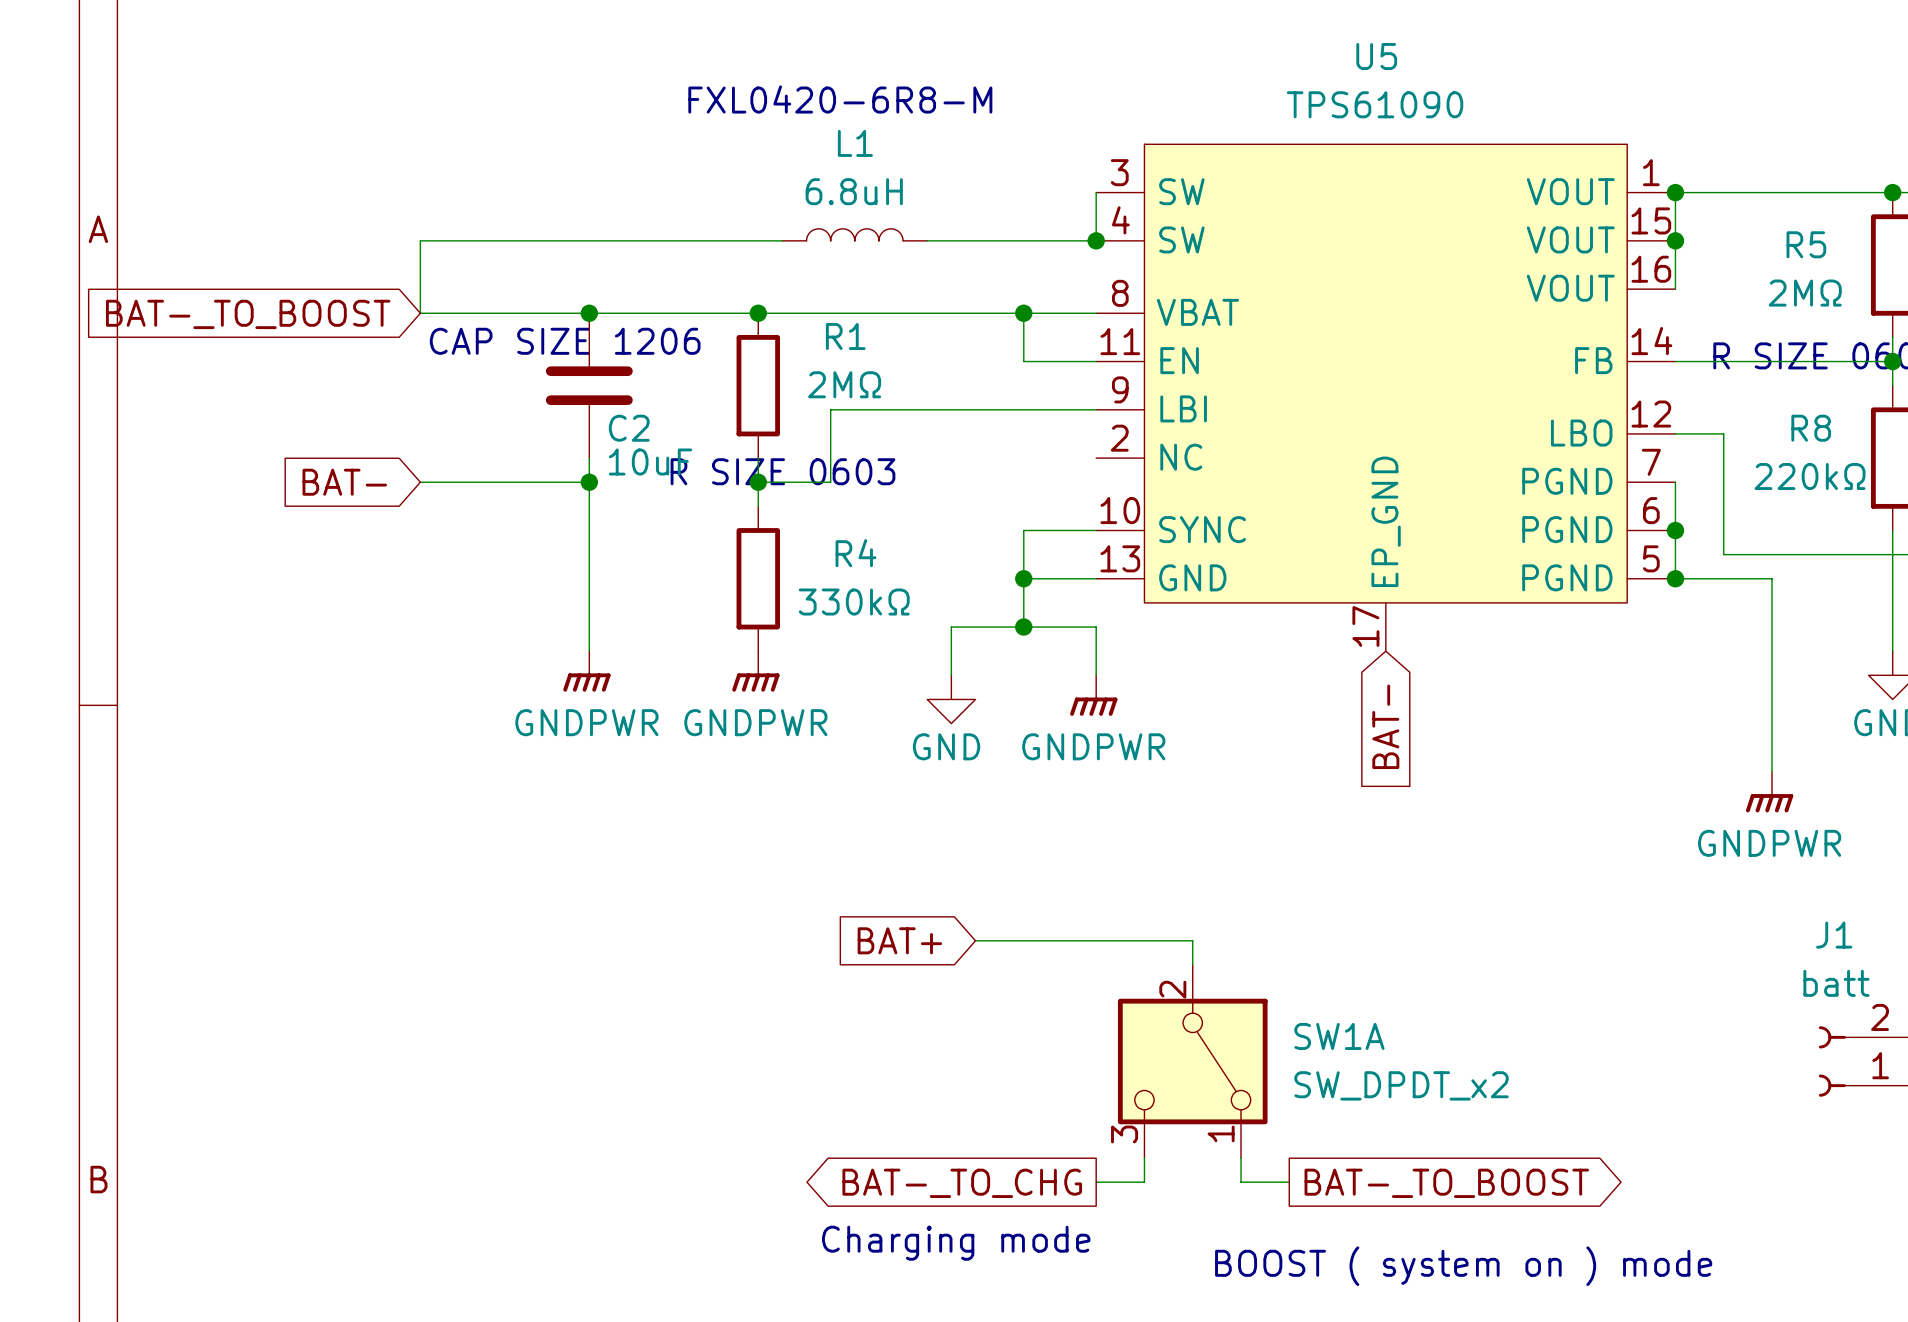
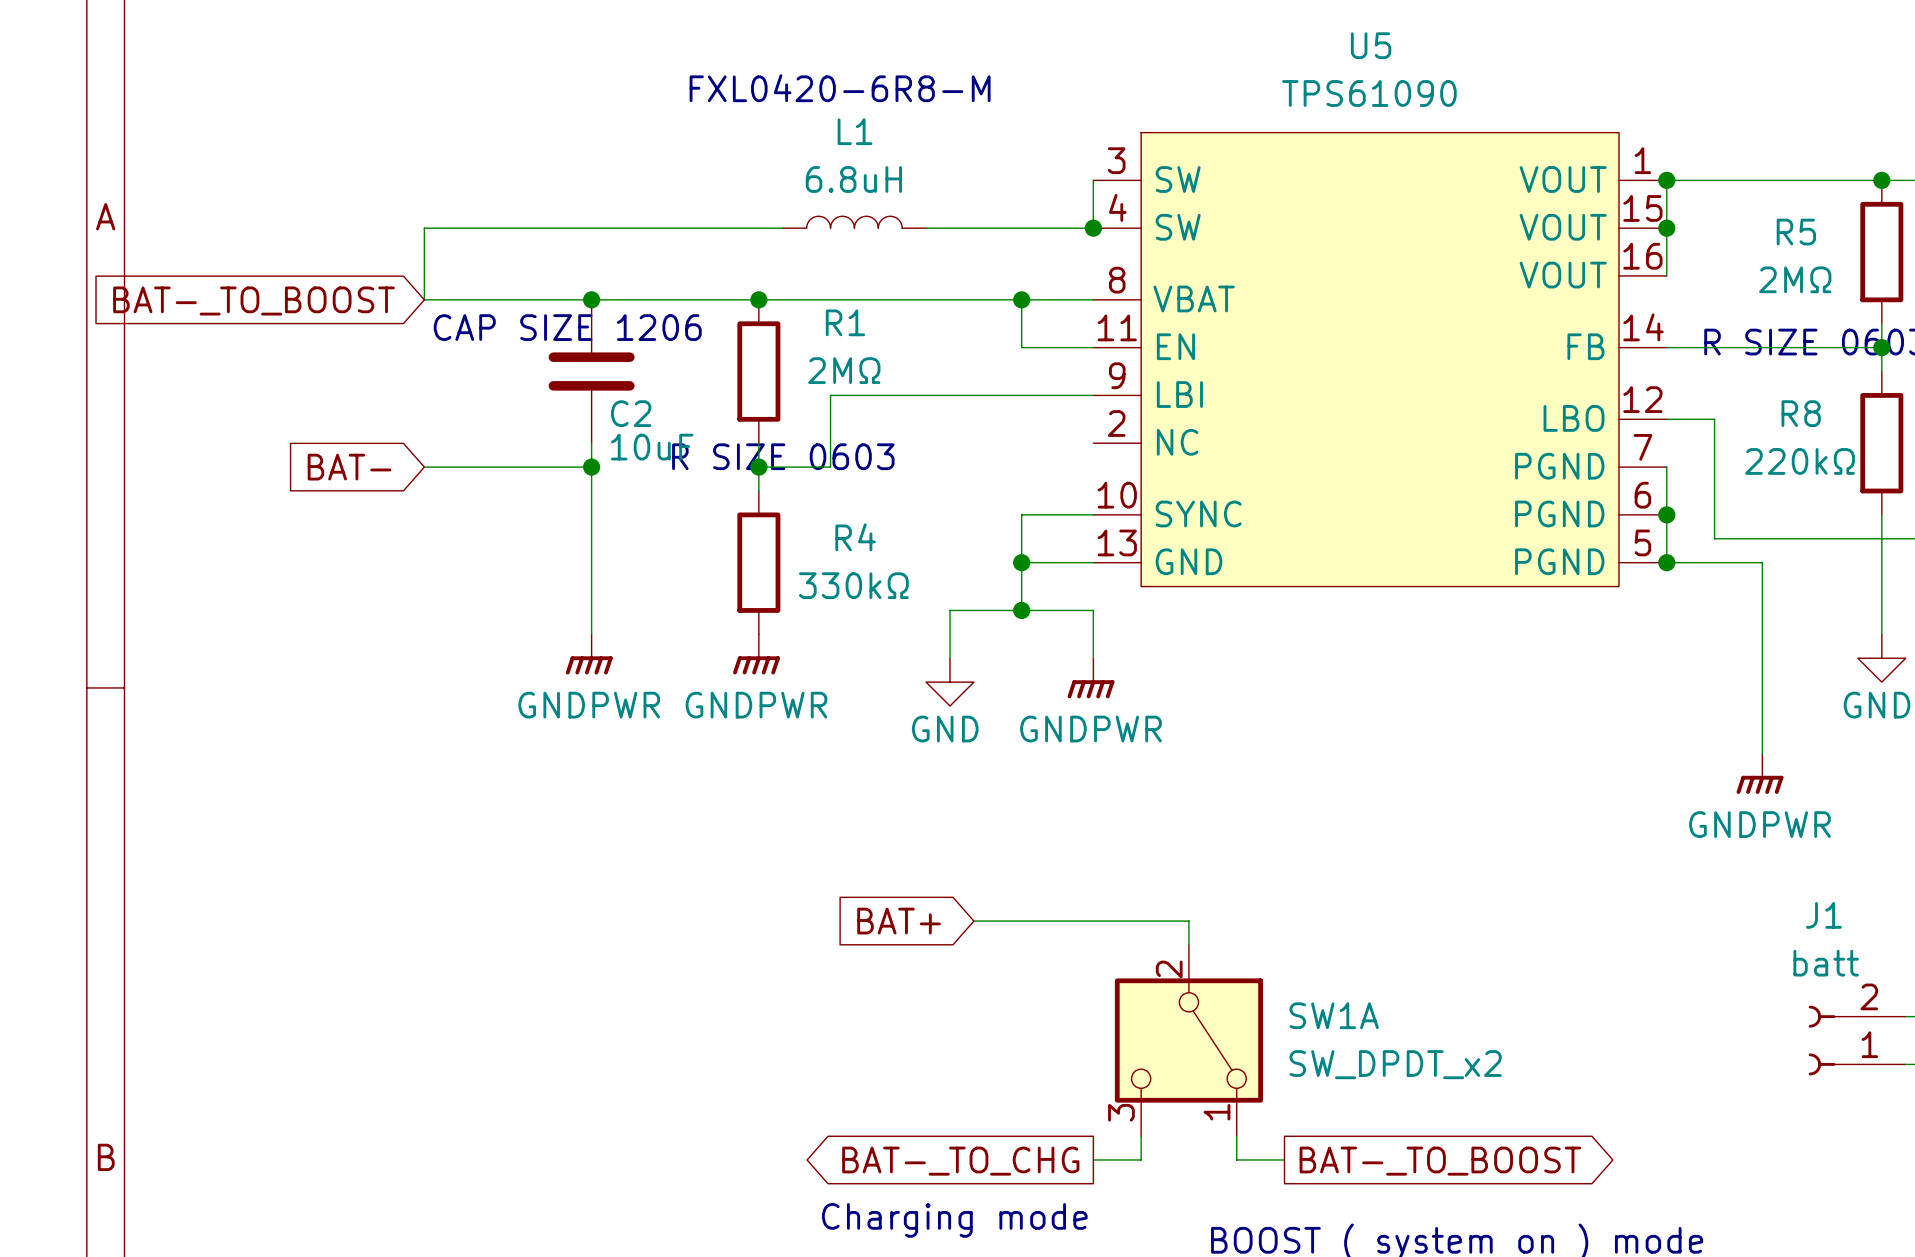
U5 symbol: [1096, 144, 1676, 652] -> [1093, 132, 1667, 587]
global label: BAT- (1385, 726) -> none

